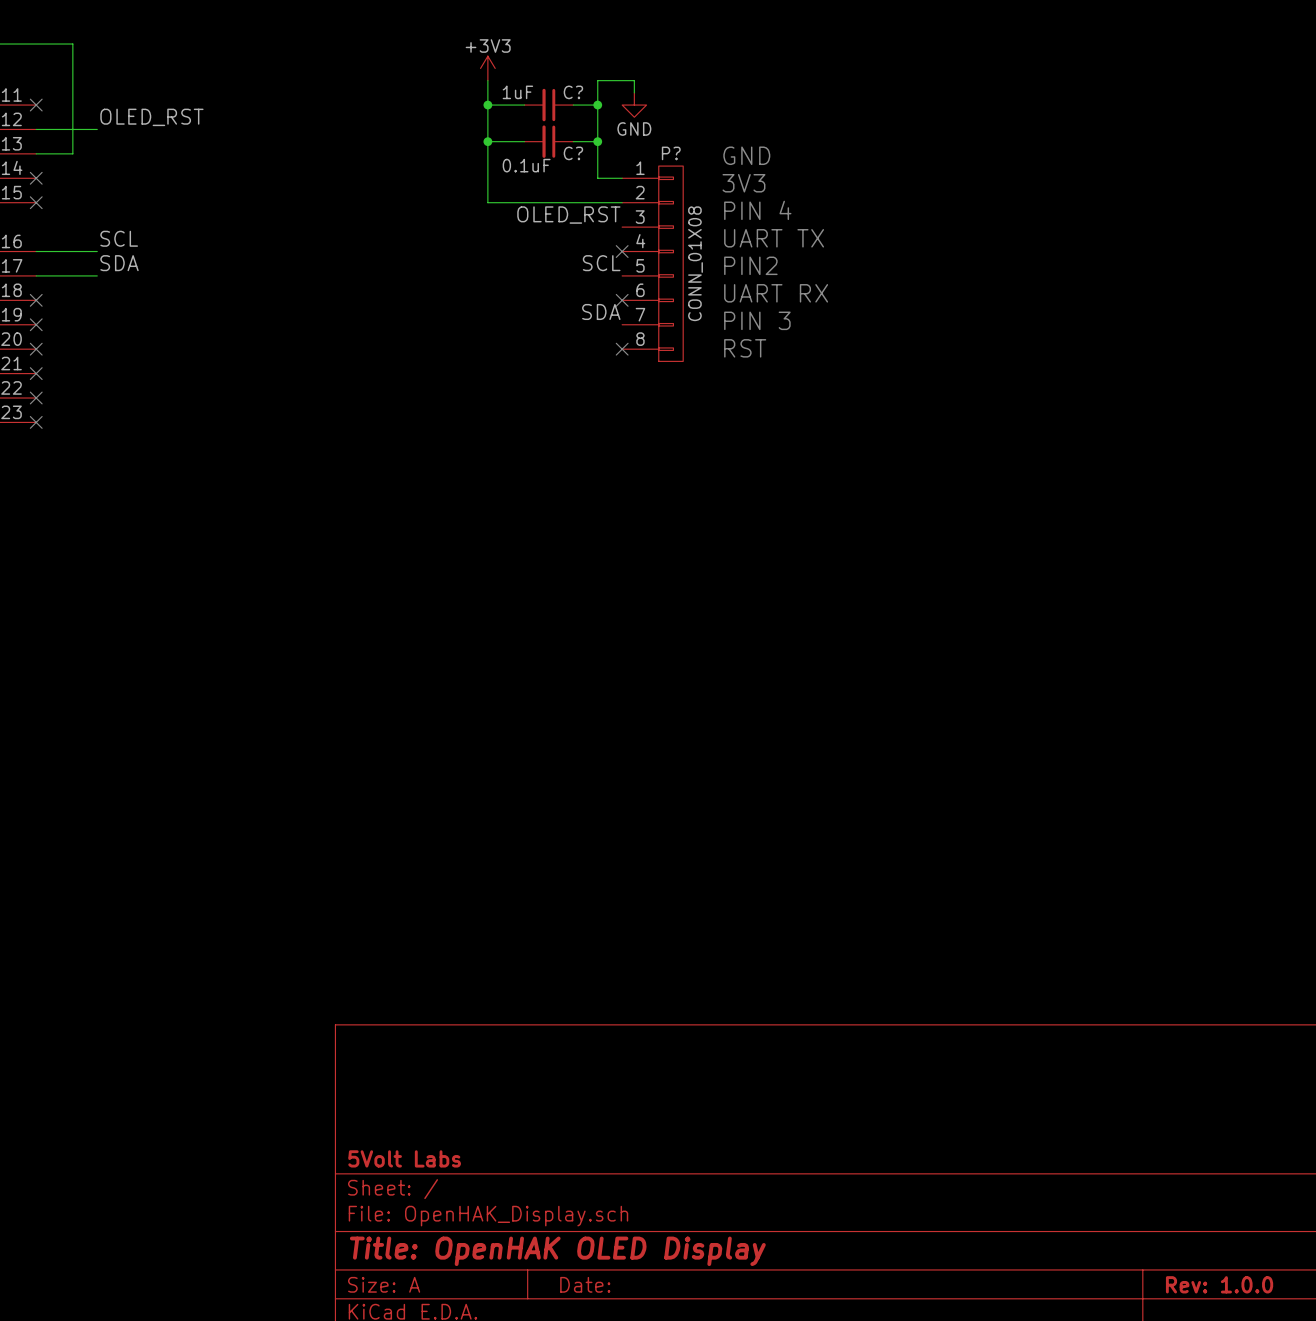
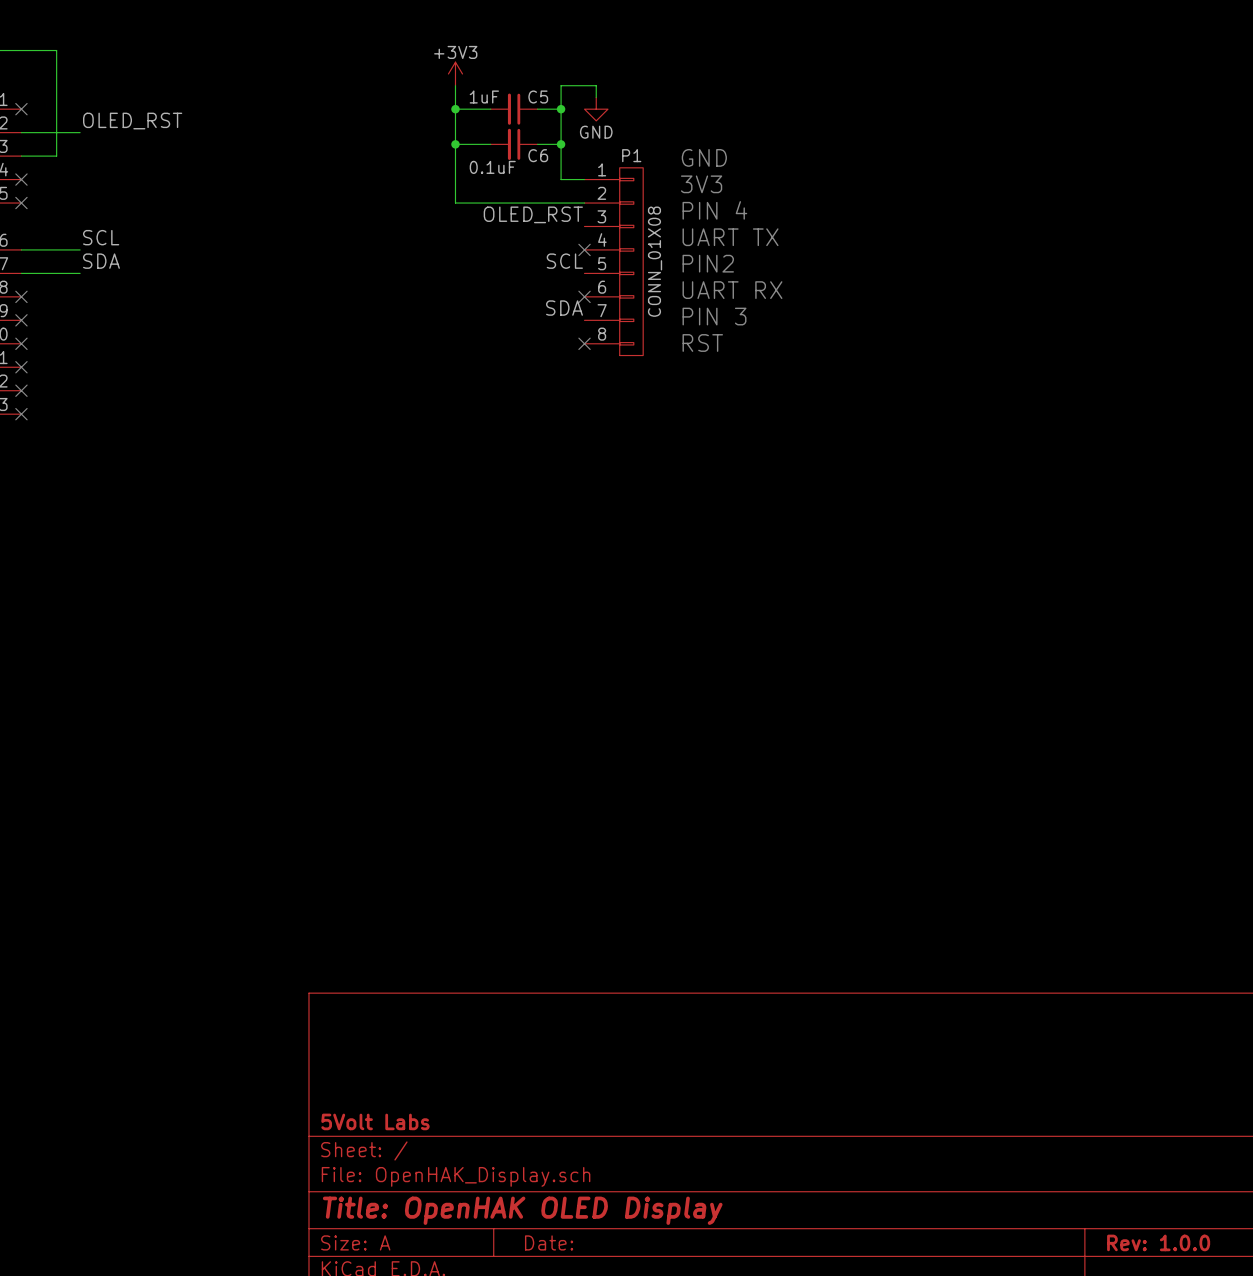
C? name: C? (573, 92) -> C5 (538, 97)
C? name: C? (573, 153) -> C6 (538, 155)
P? name: P? (671, 153) -> P1 (631, 155)

